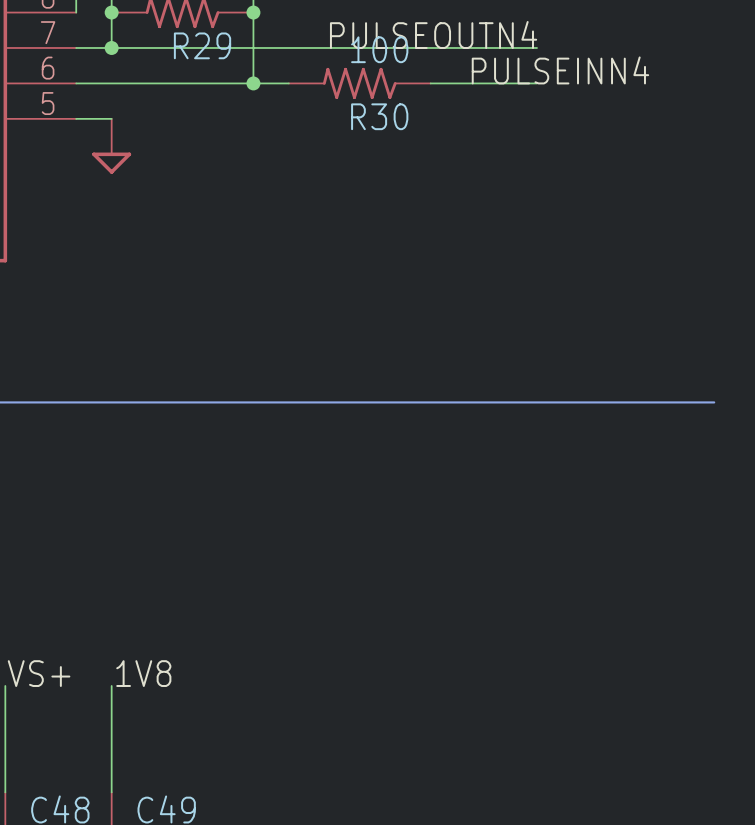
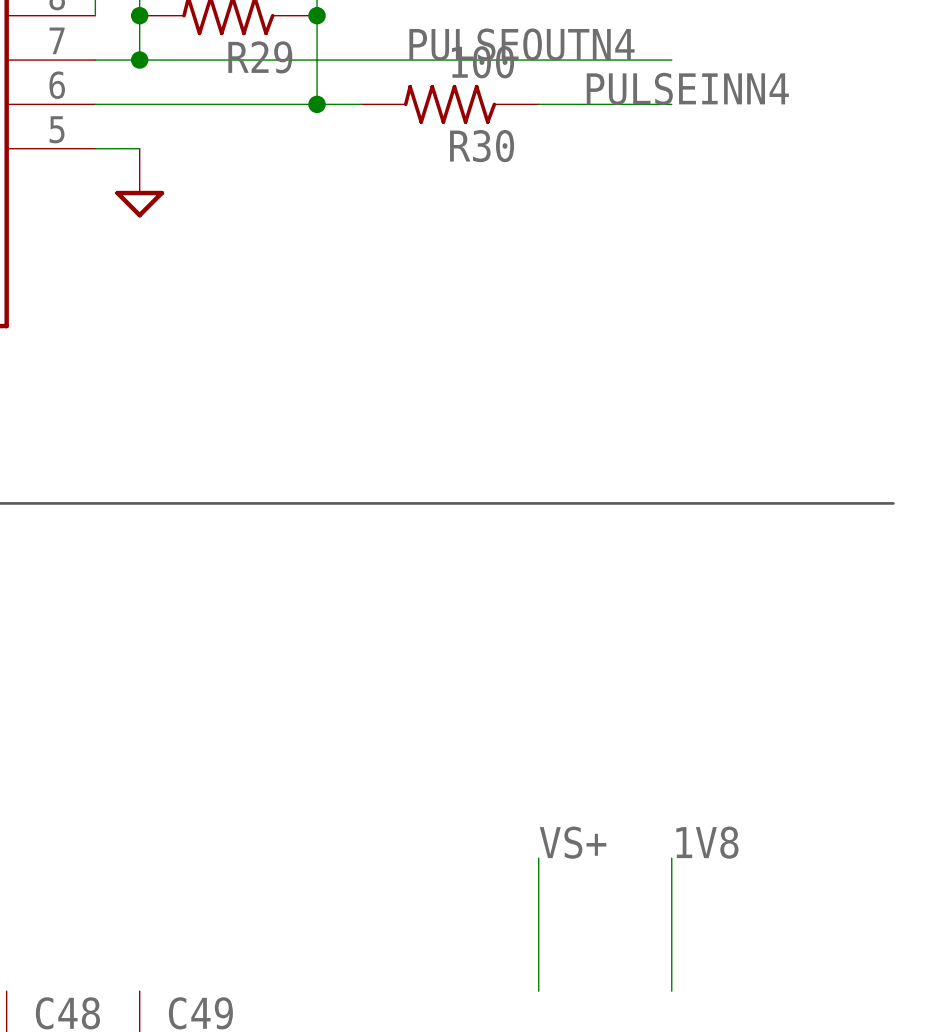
label: VS+ (39, 673) -> none
label: 1V8 (143, 673) -> none
label: none -> VS+ (573, 842)
label: none -> 1V8 (707, 842)
wire: (5, 685) (5, 792) -> none
wire: (111, 685) (111, 792) -> (538, 858) (538, 991)
wire: none -> (671, 858) (671, 991)

